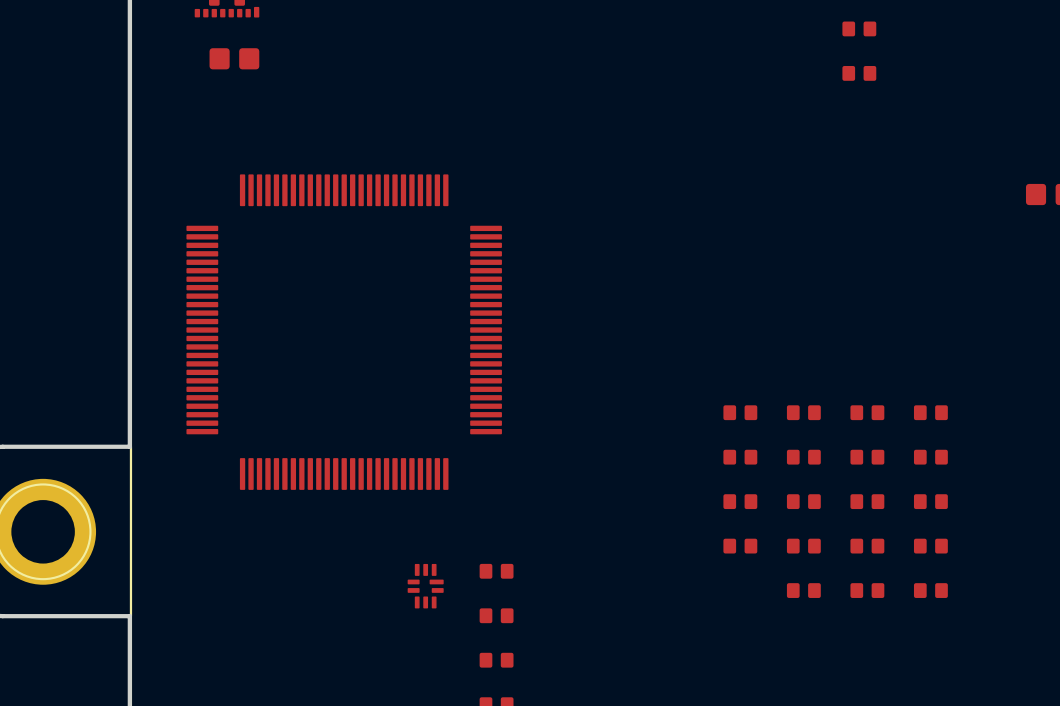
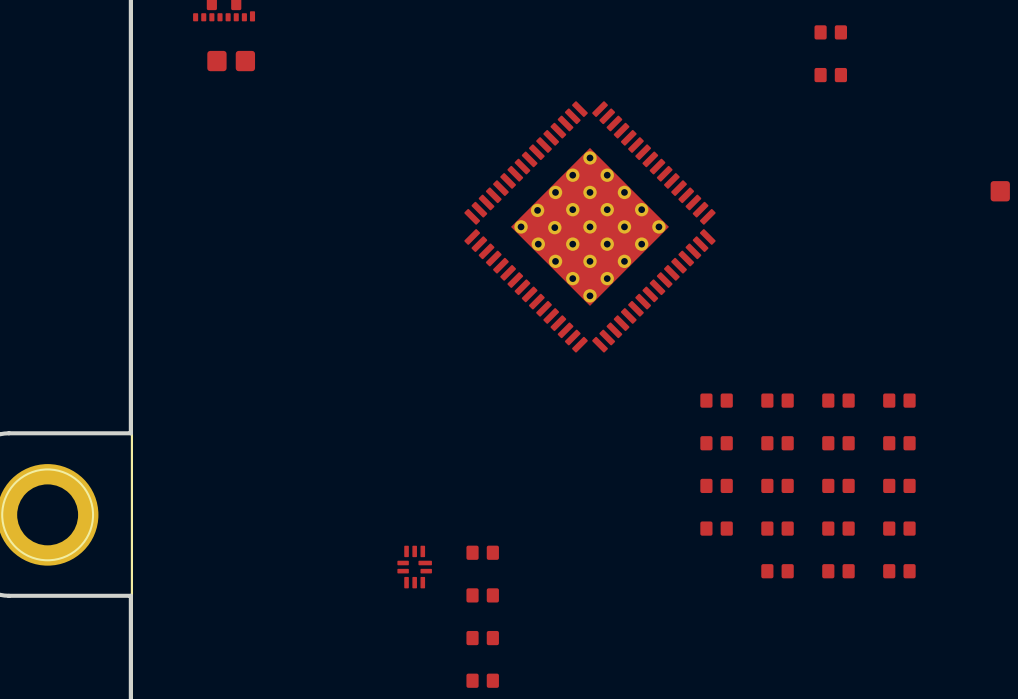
part: none -> (589, 226)
part: (344, 332) -> none

